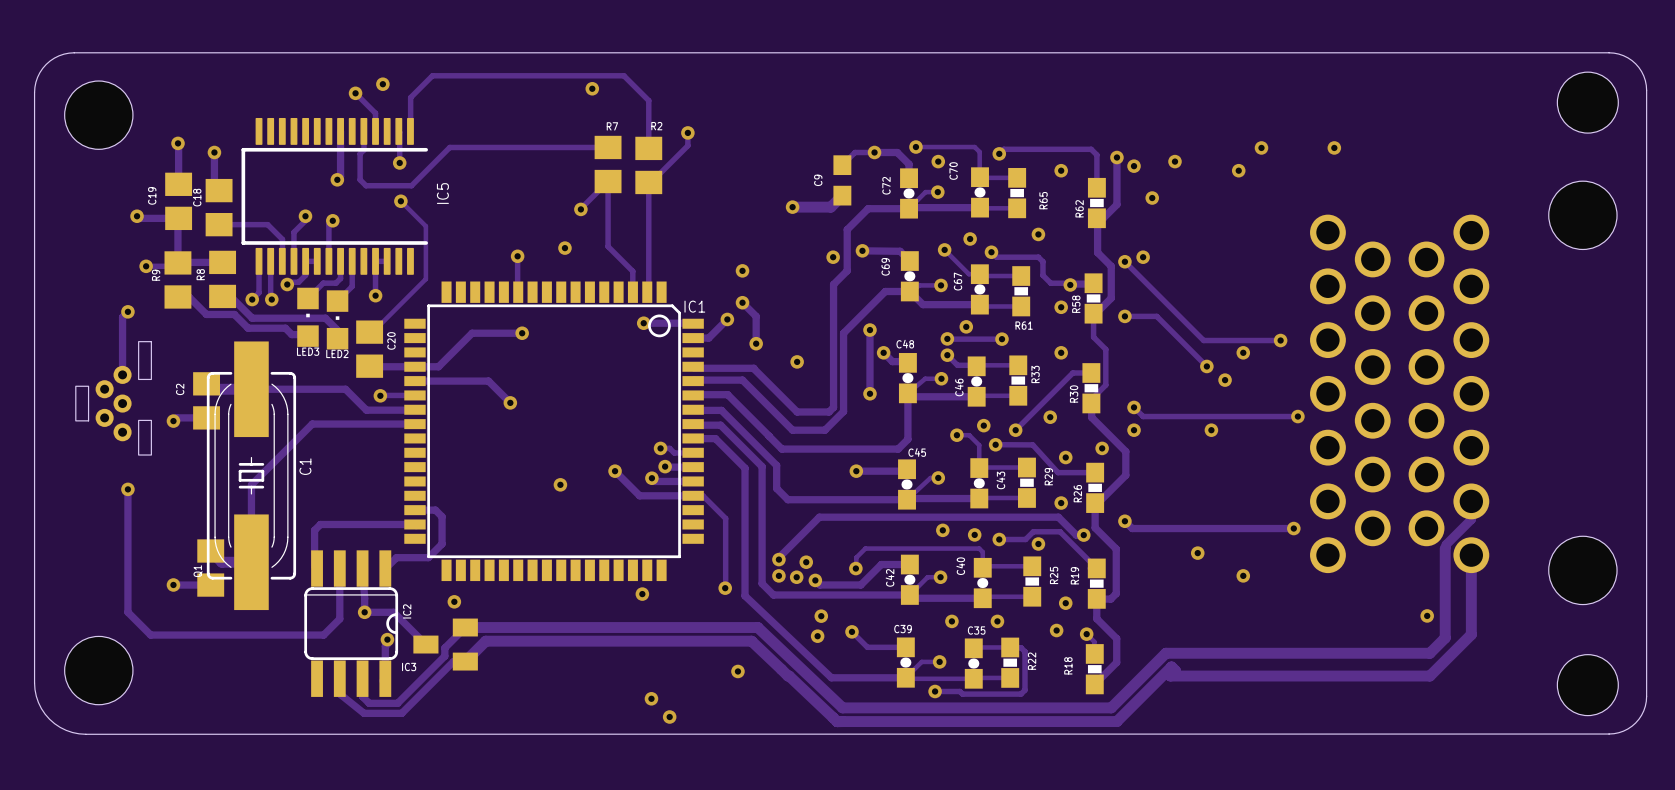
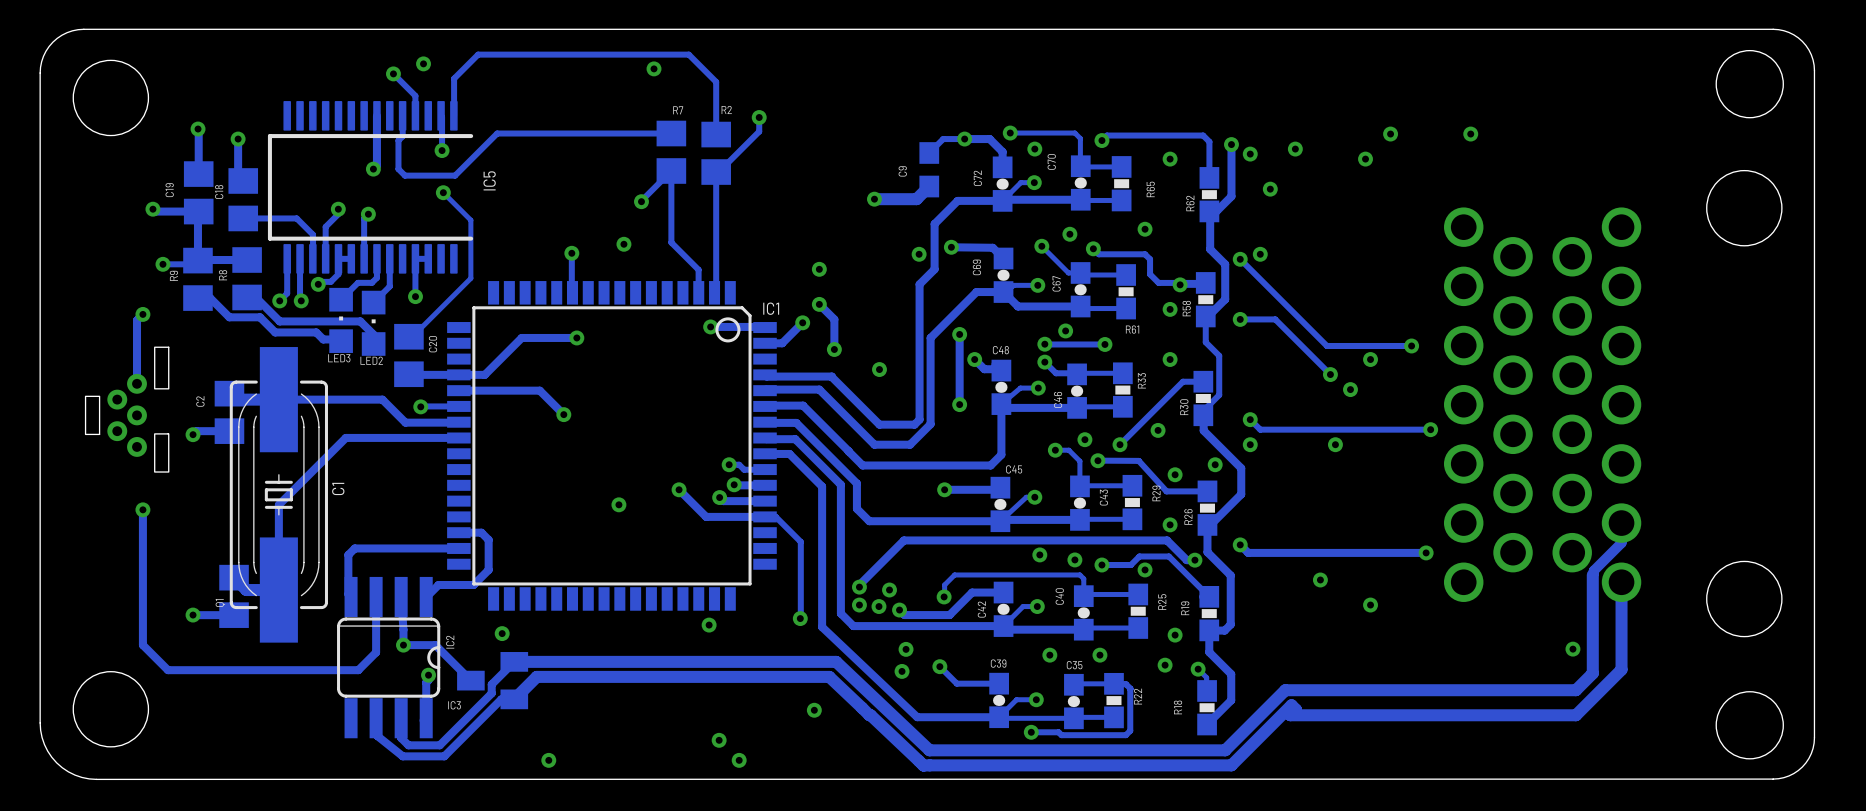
via: none -> (548, 760)

